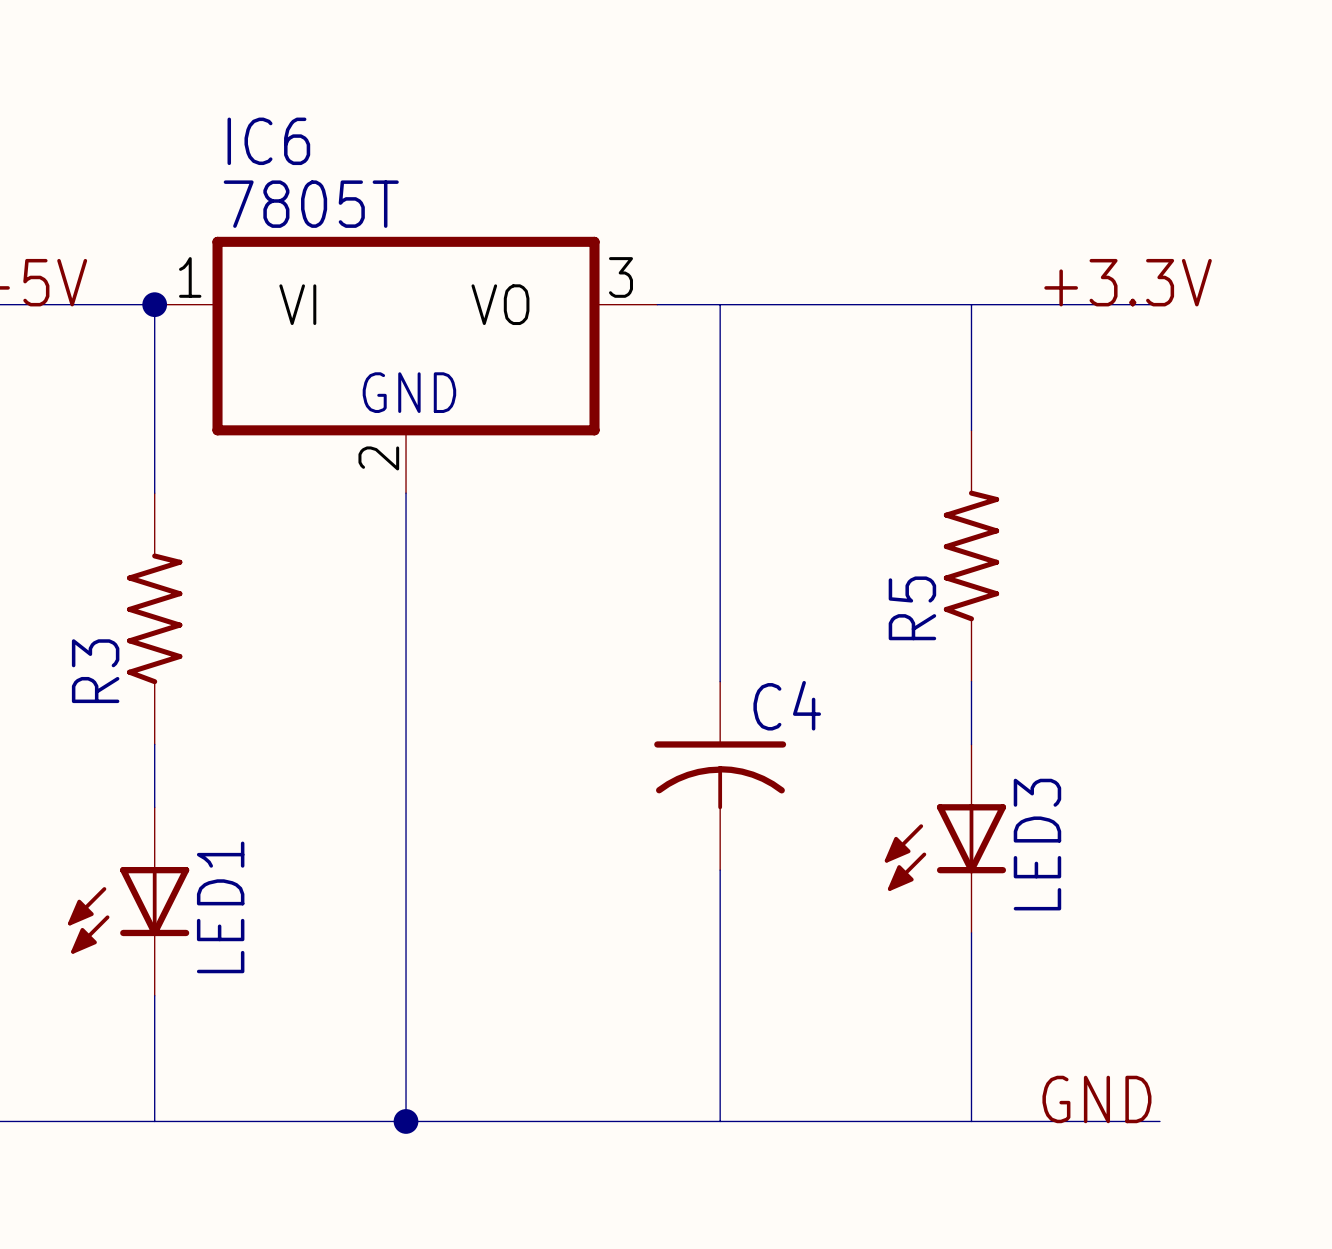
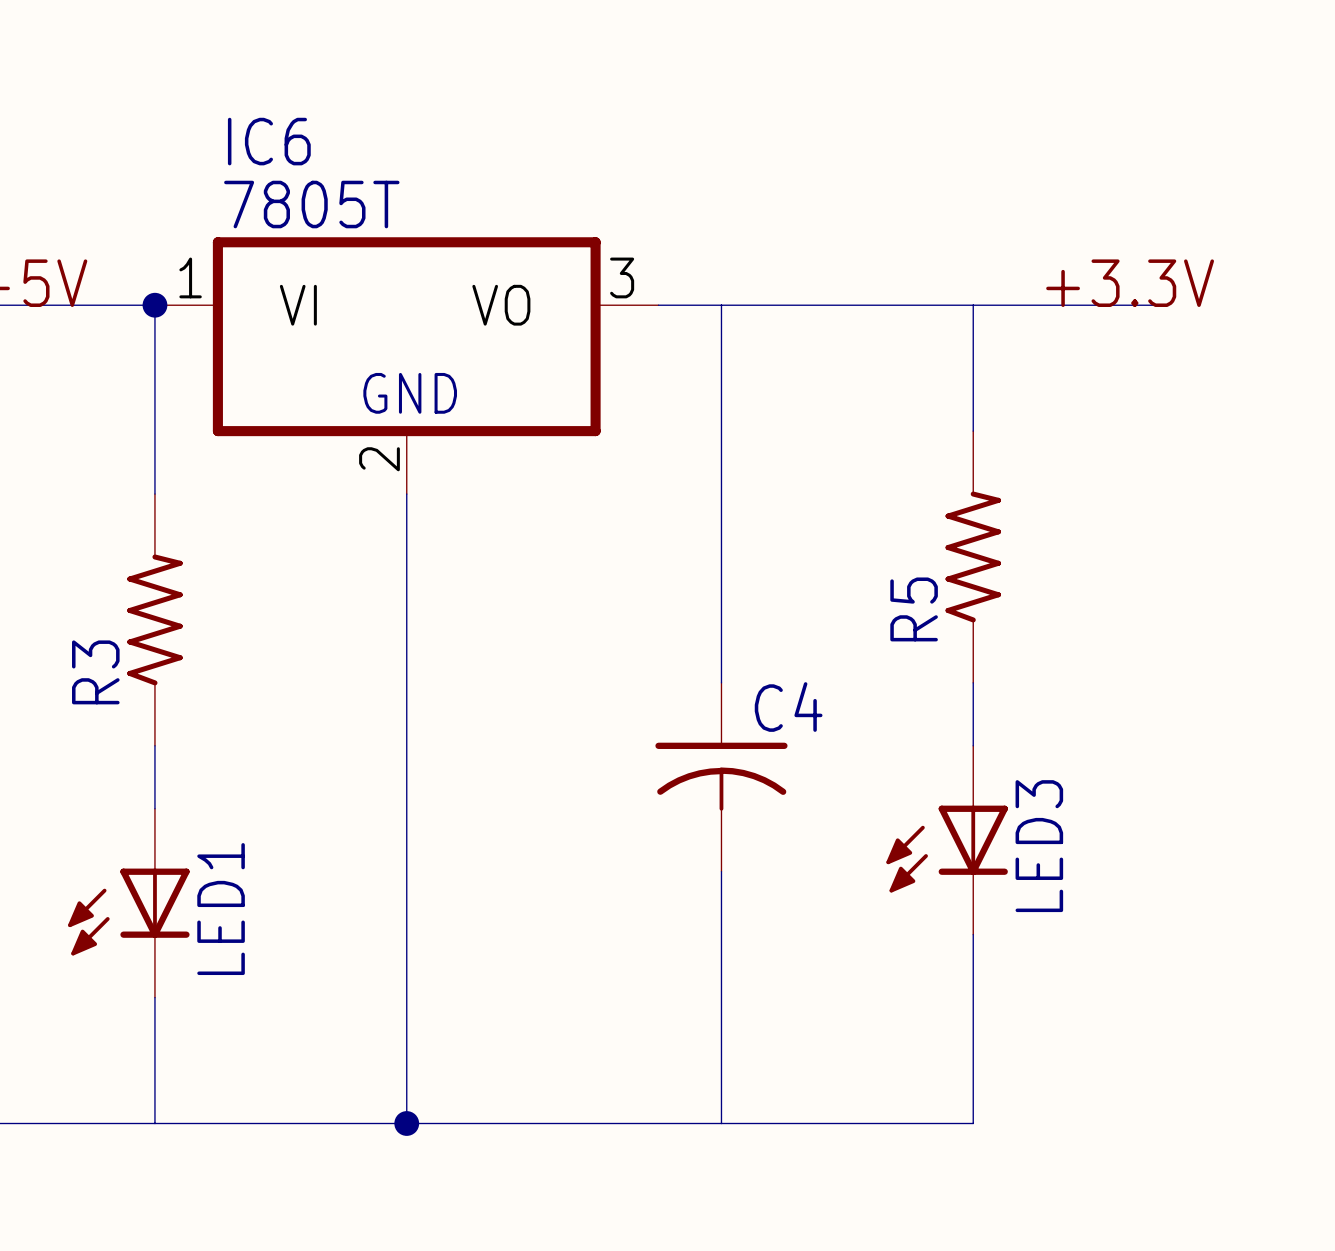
label: GND (1096, 1099) -> none
wire: (971, 1121) (1159, 1121) -> none

